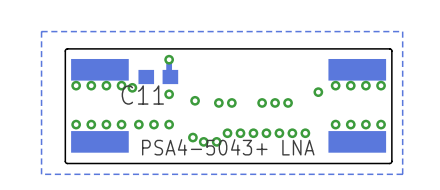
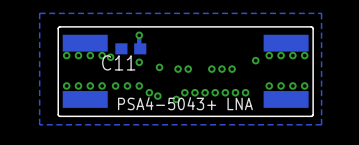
via position: (203, 141) -> (149, 92)

